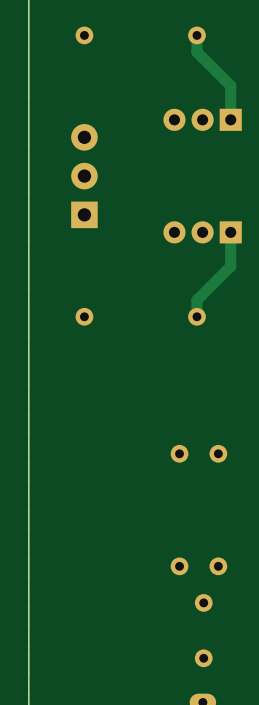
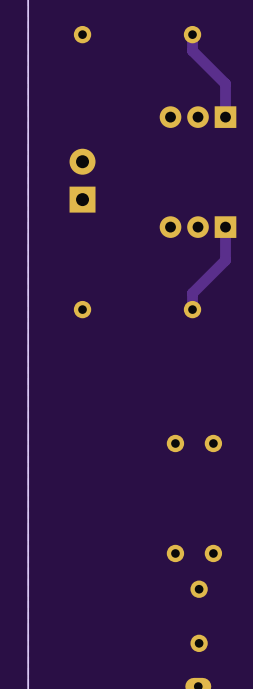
part footprint: [71, 124, 98, 229] -> [69, 148, 96, 213]

